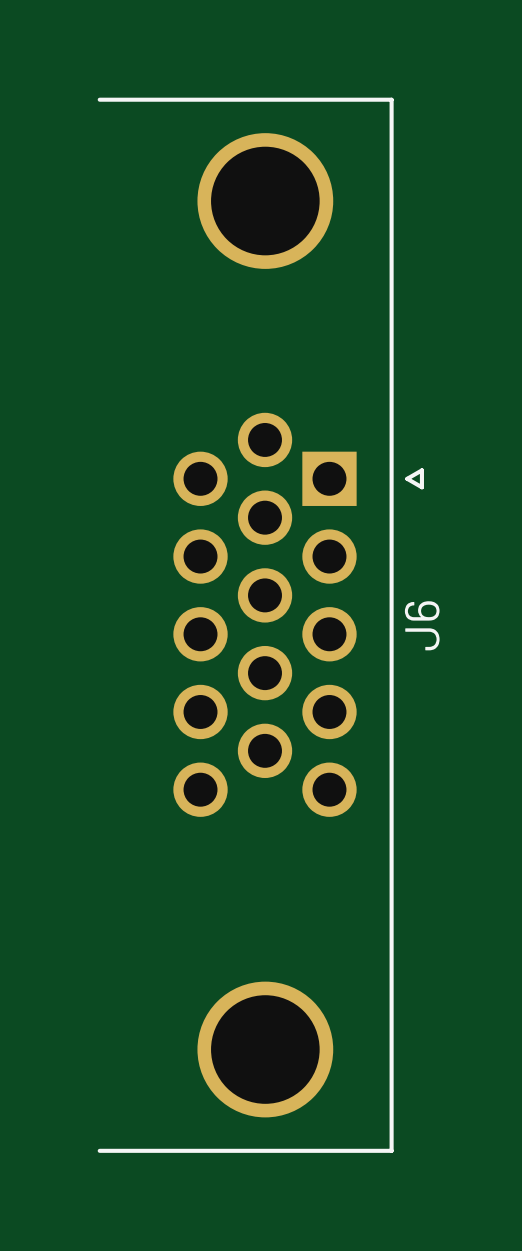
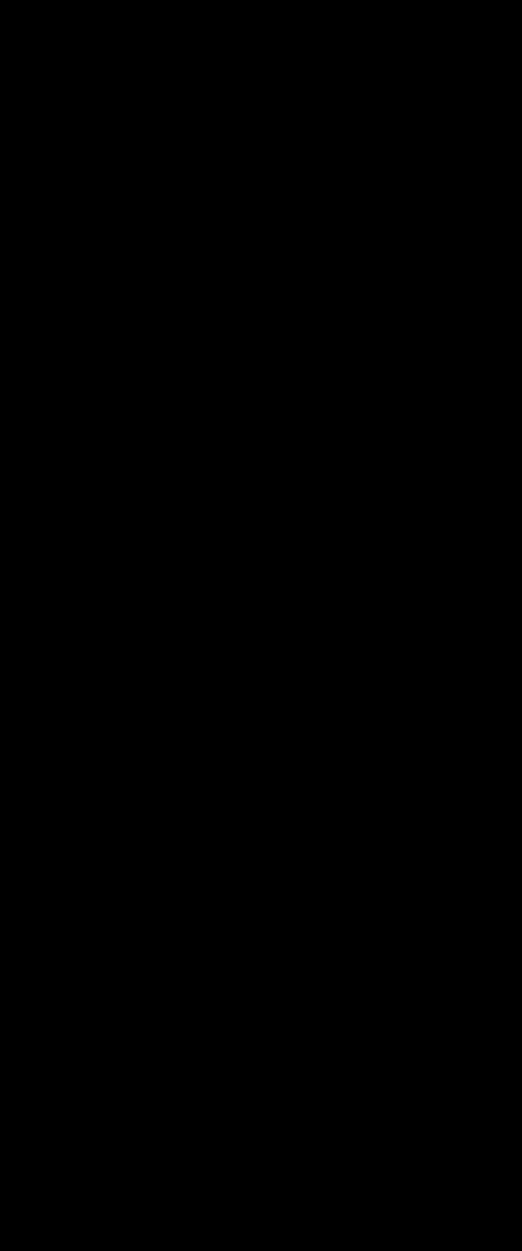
J6: (260, 625) -> none

